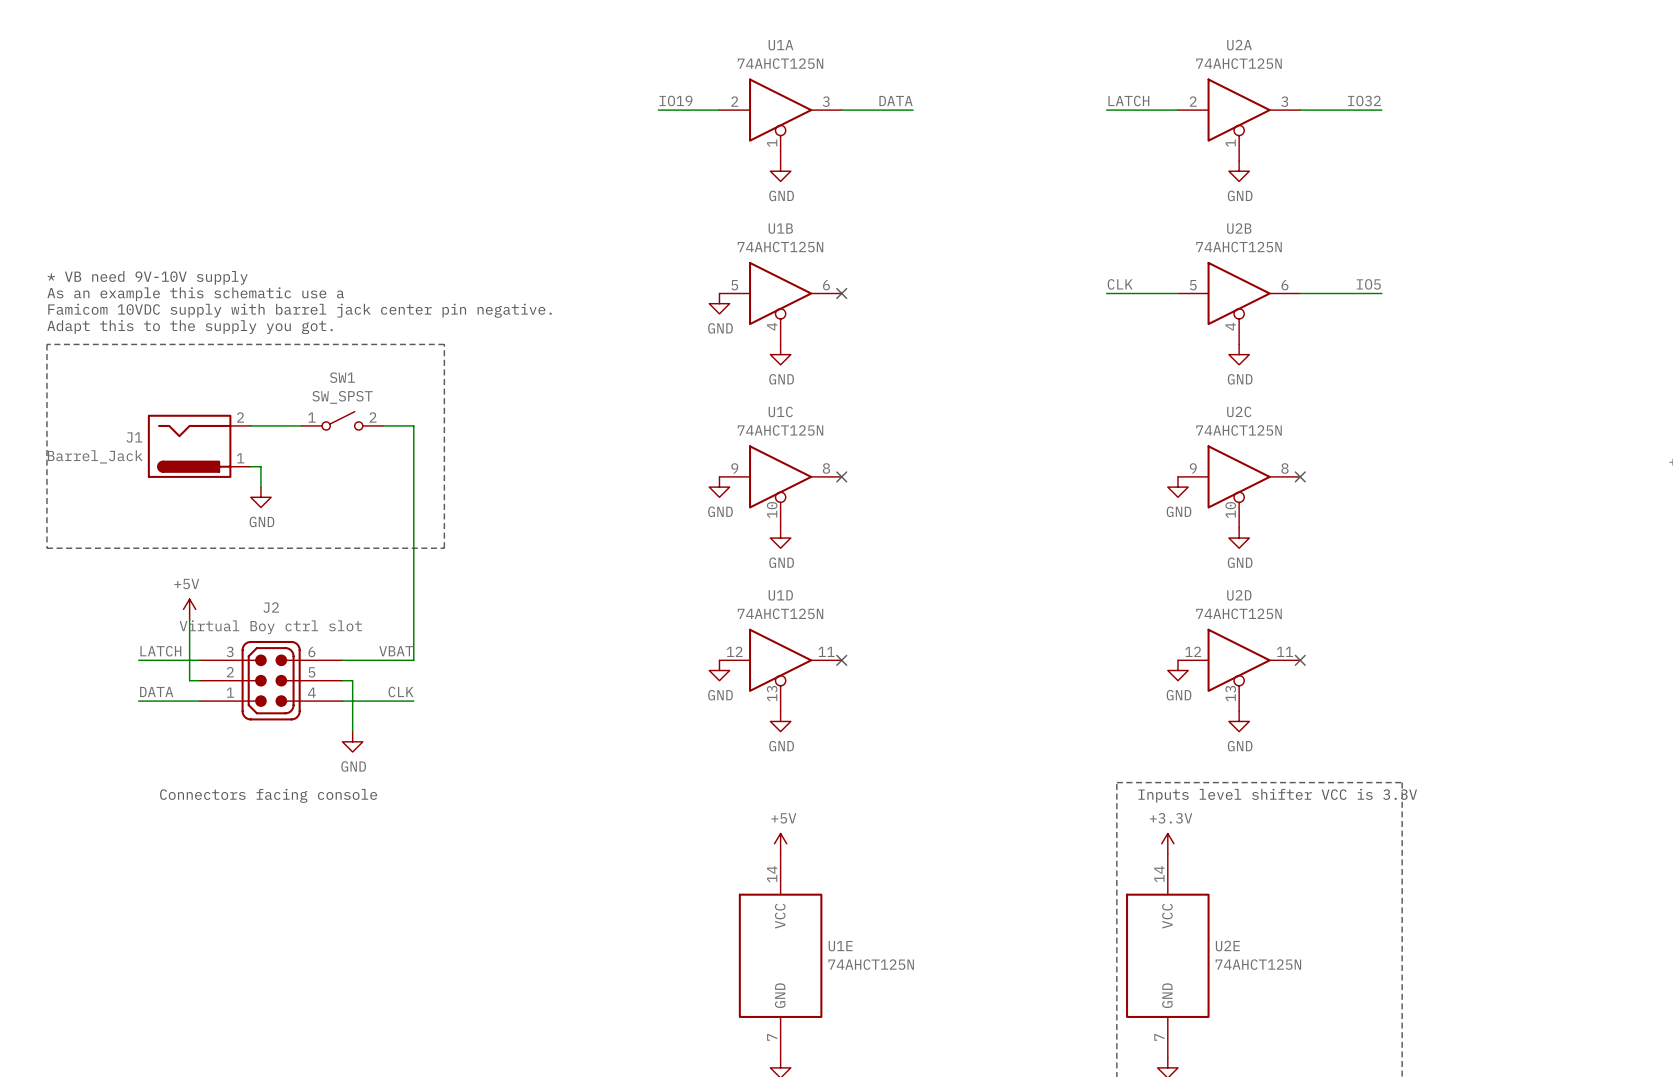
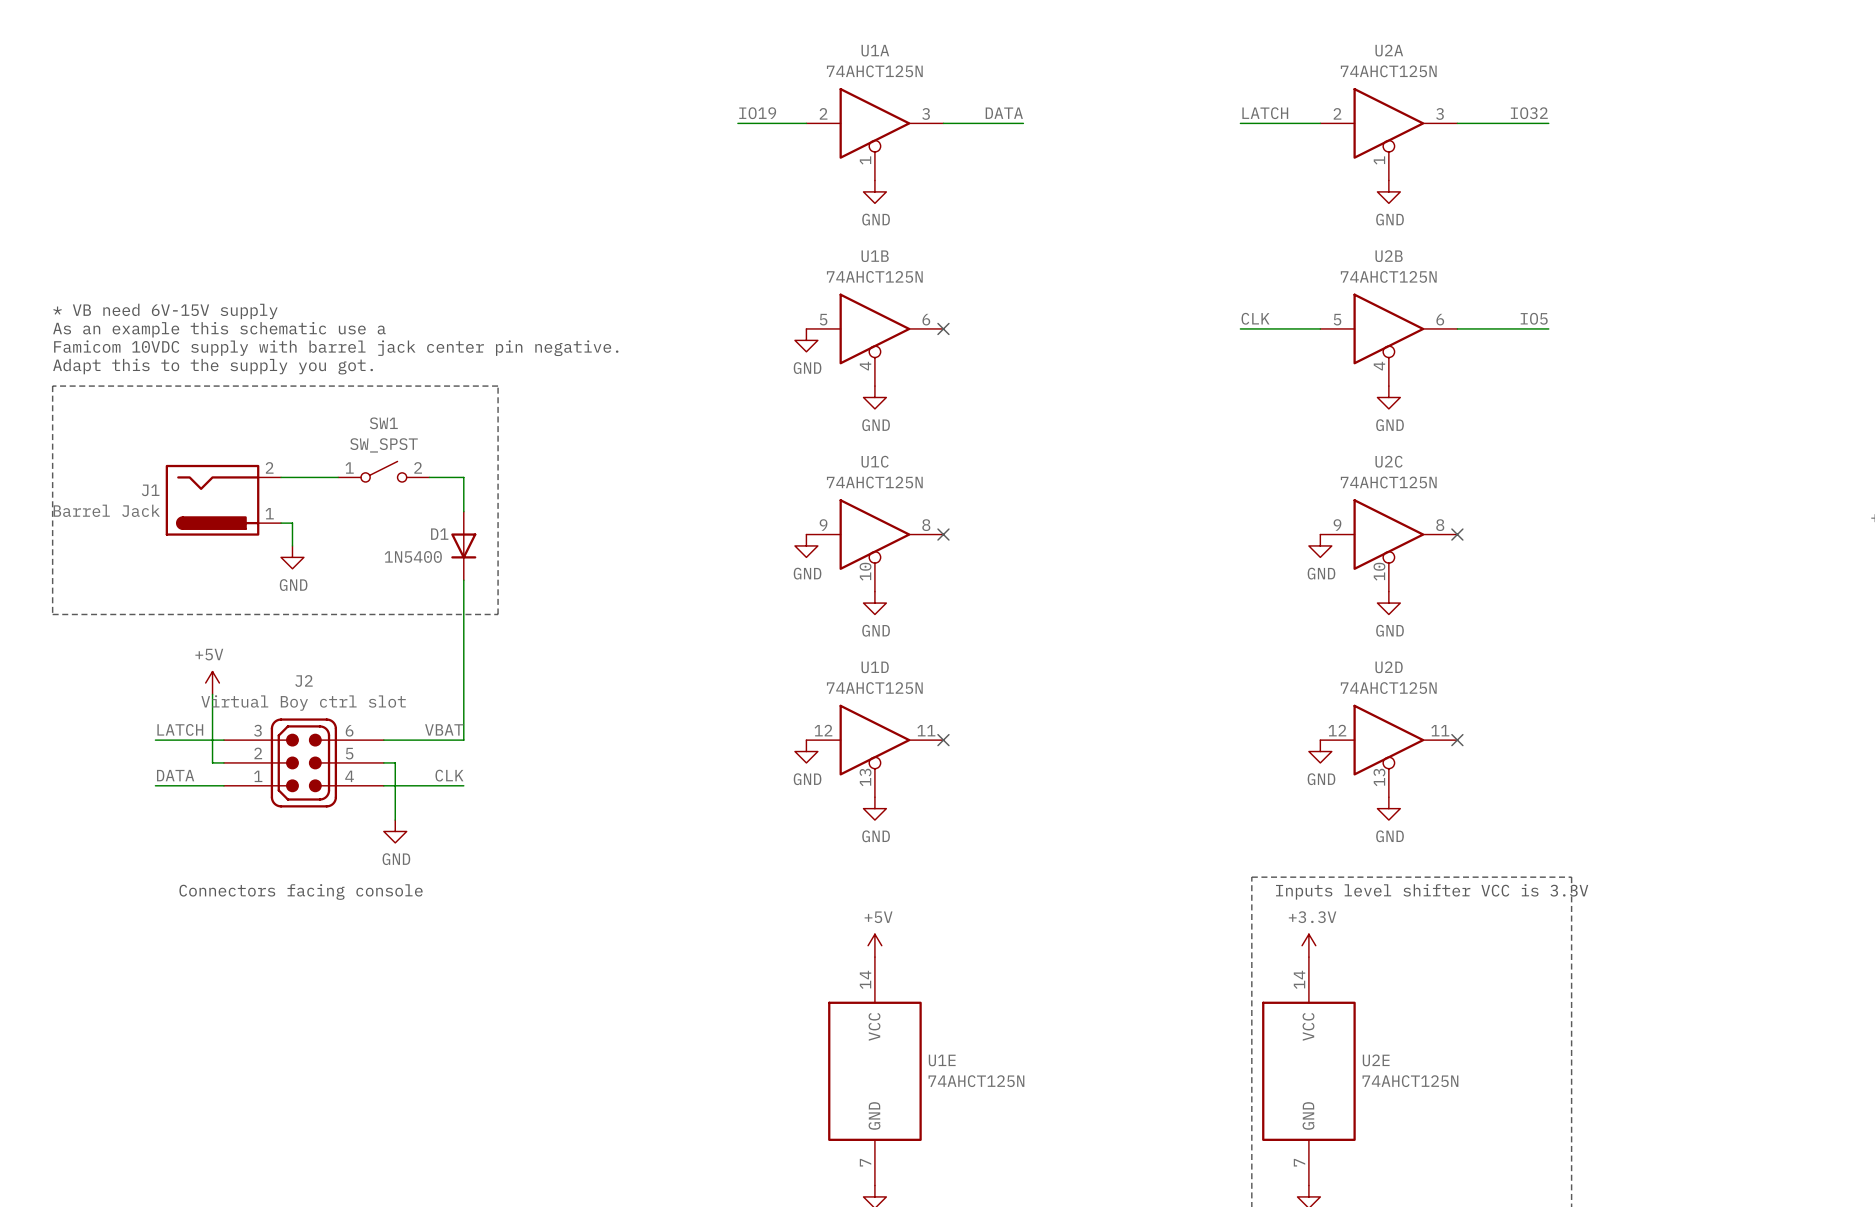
text: * VB need 9V-10V supply (147, 277) -> * VB need 6V-15V supply (165, 311)
J1 value: Barrel_Jack (95, 456) -> Barrel Jack (106, 510)
D1: none -> 1N5400 (463, 545)

